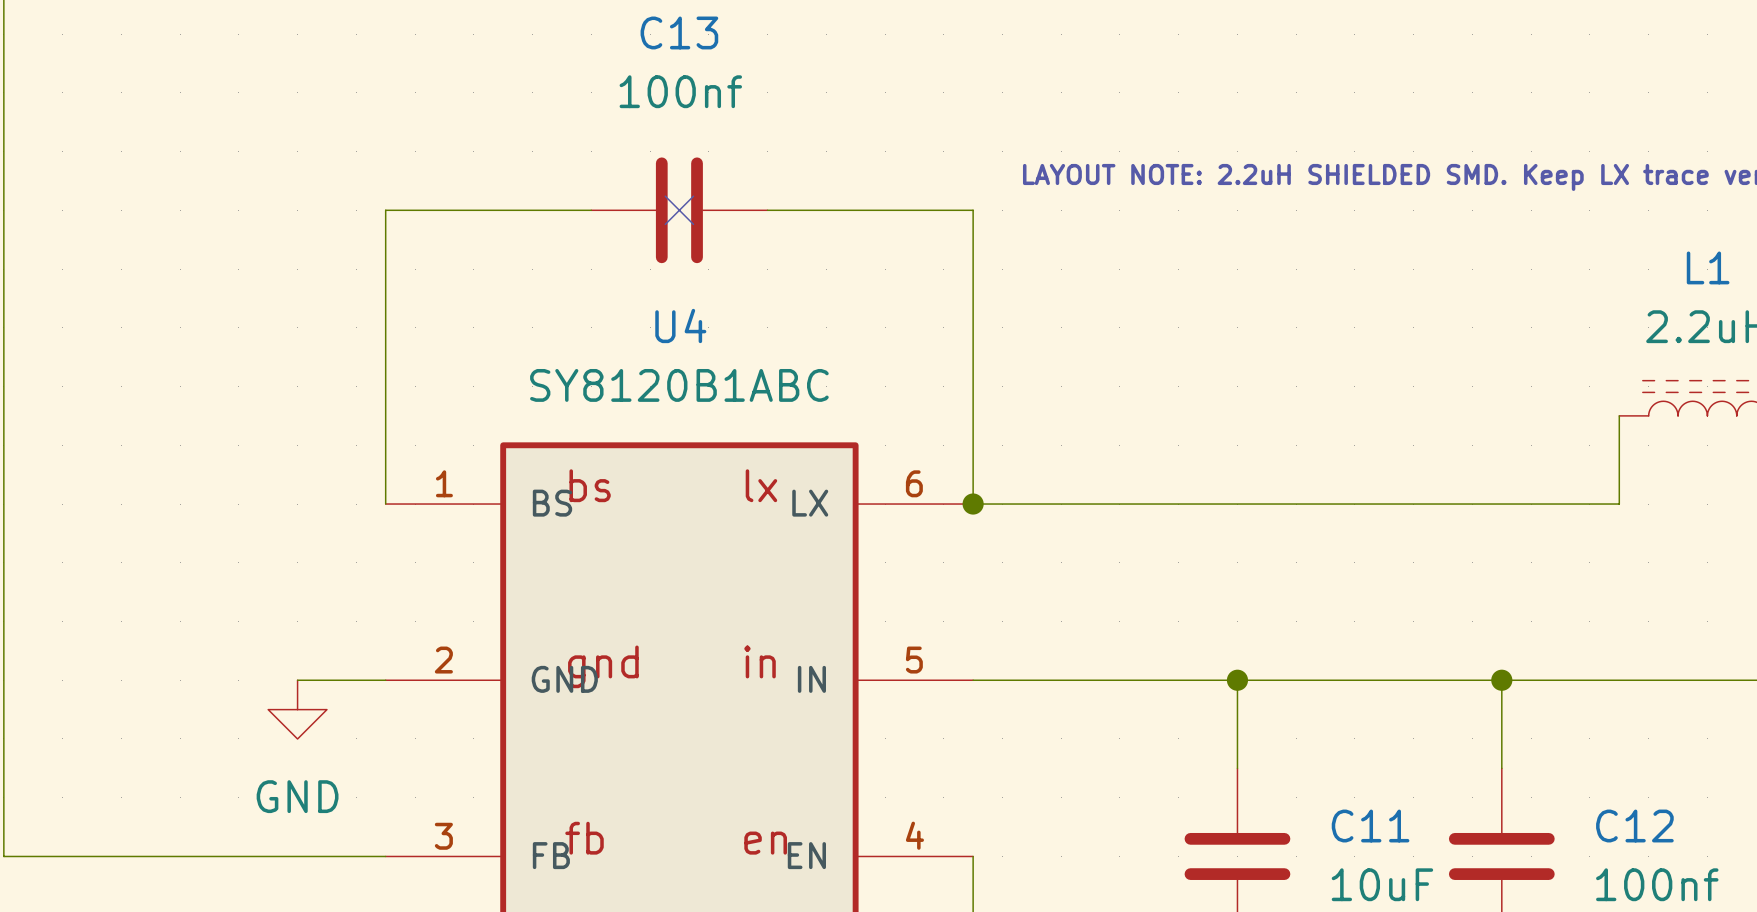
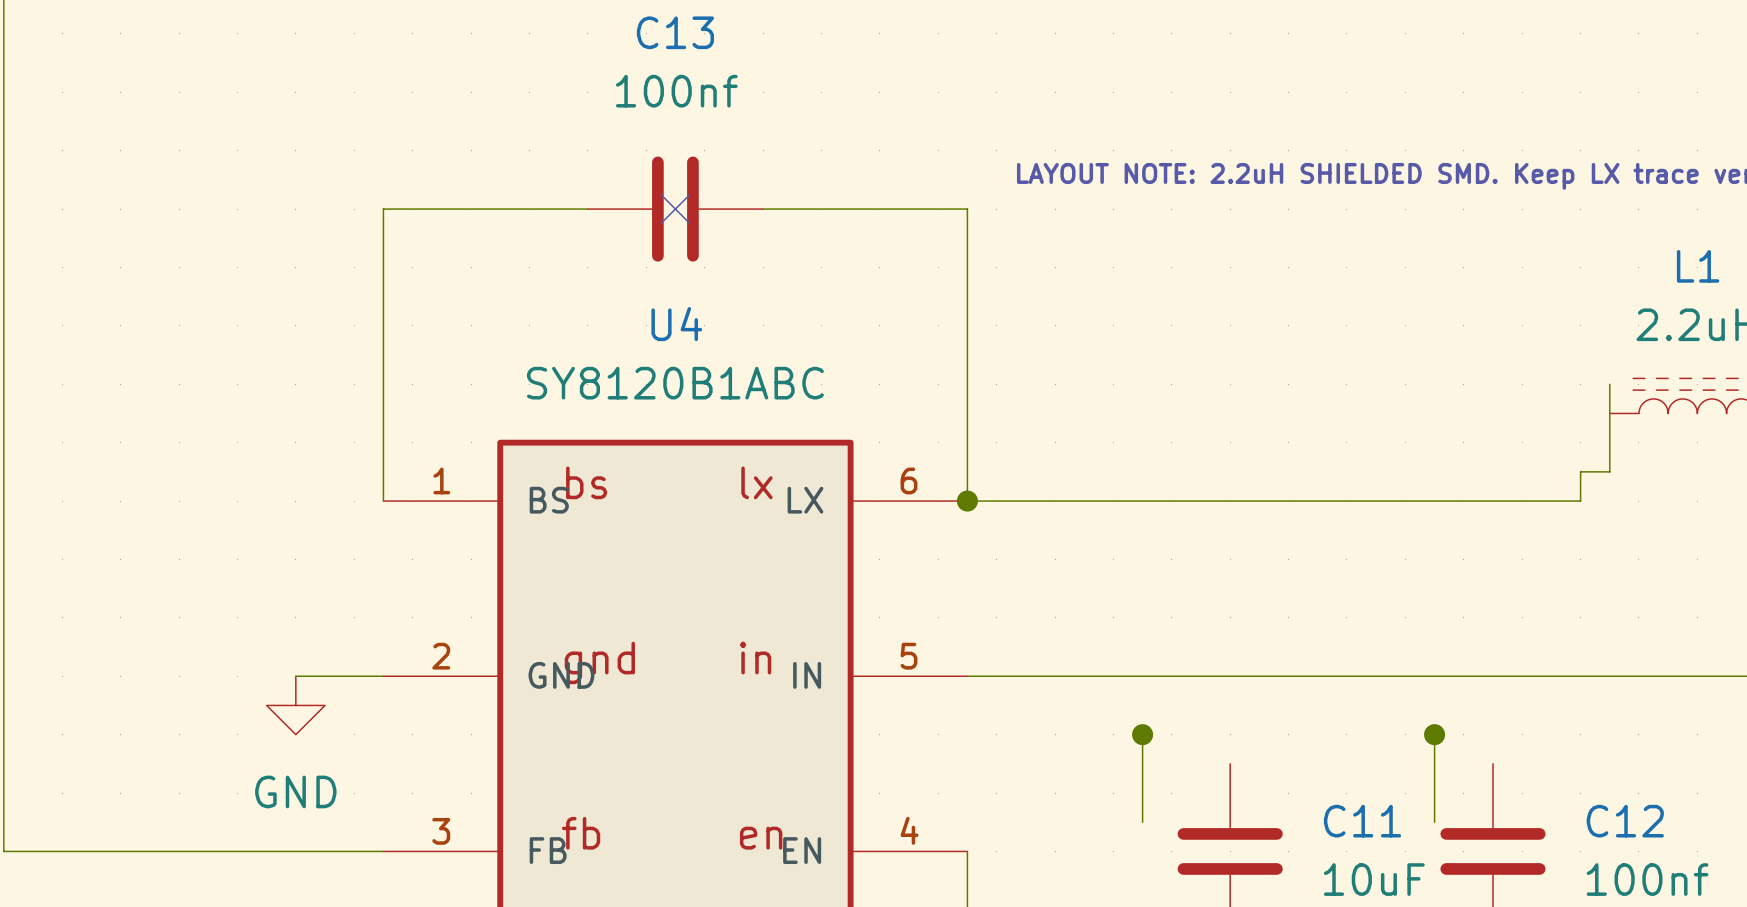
wire: none -> (1609, 384) (1609, 413)
wire: (1619, 474) (1619, 504) (1589, 504) -> (1609, 471) (1580, 471) (1580, 501)
wire: (1237, 680) (1237, 768) -> (1142, 734) (1142, 822)
junction position: (1237, 680) -> (1142, 734)
wire: (1501, 680) (1501, 768) -> (1434, 734) (1434, 822)
junction position: (1501, 680) -> (1434, 734)

